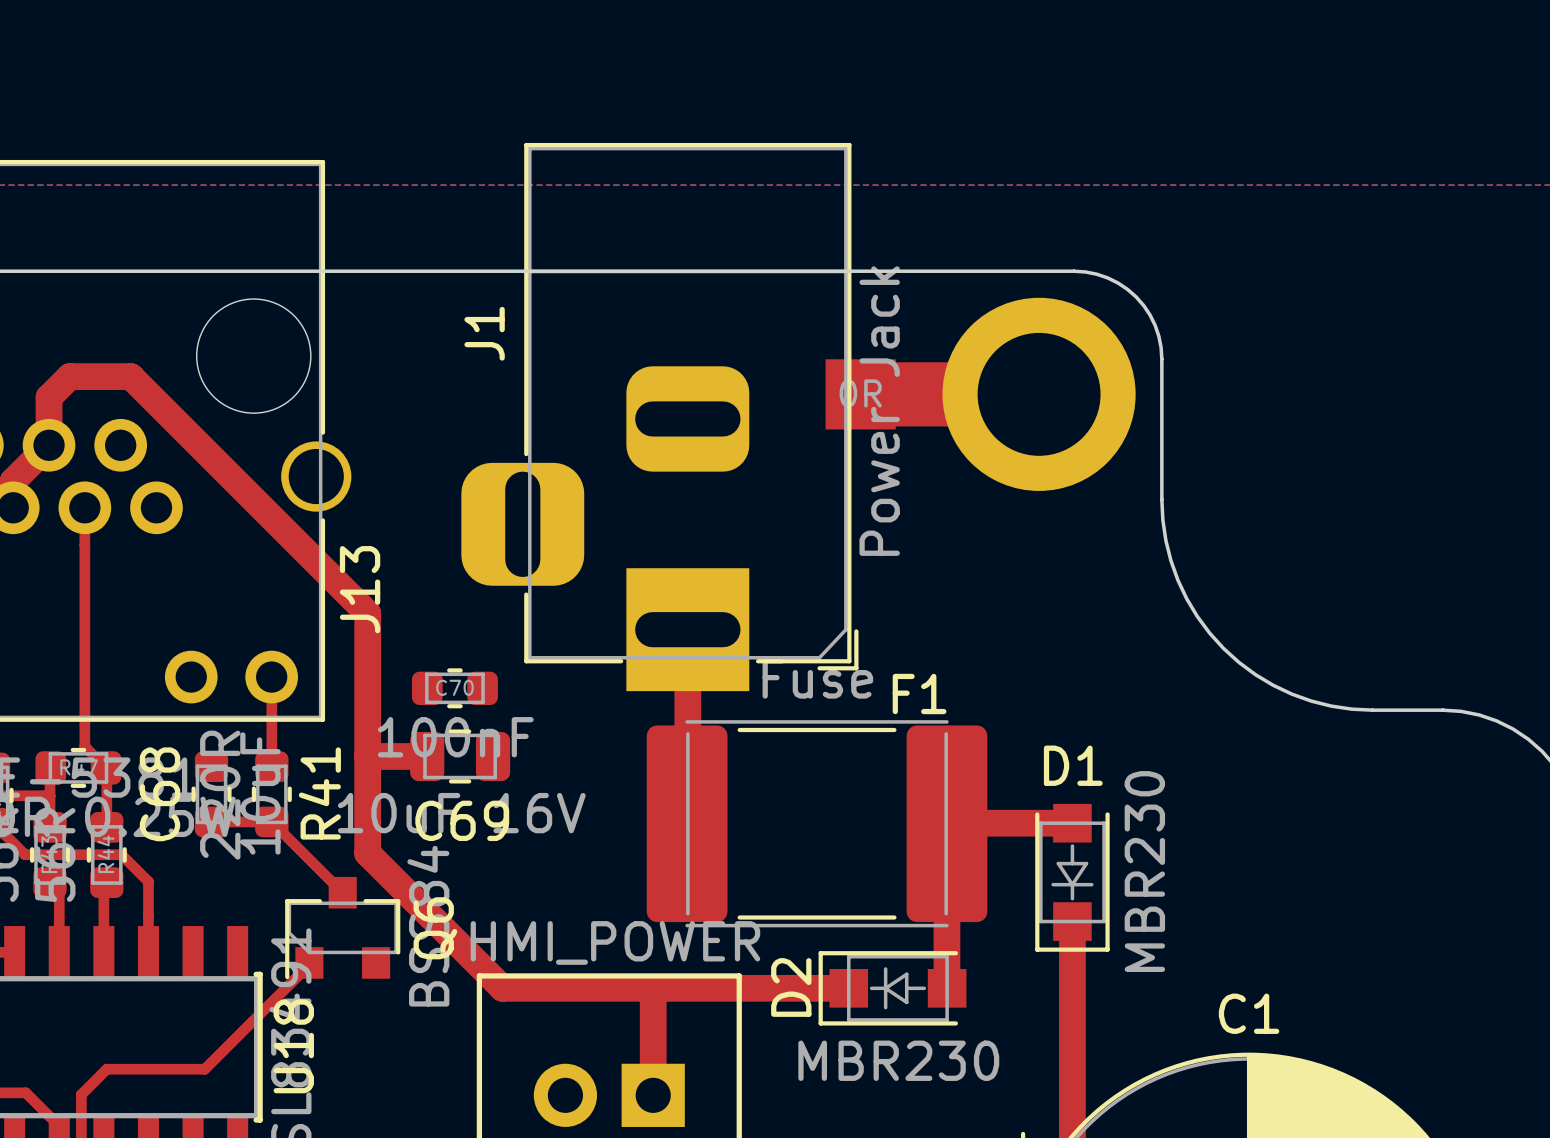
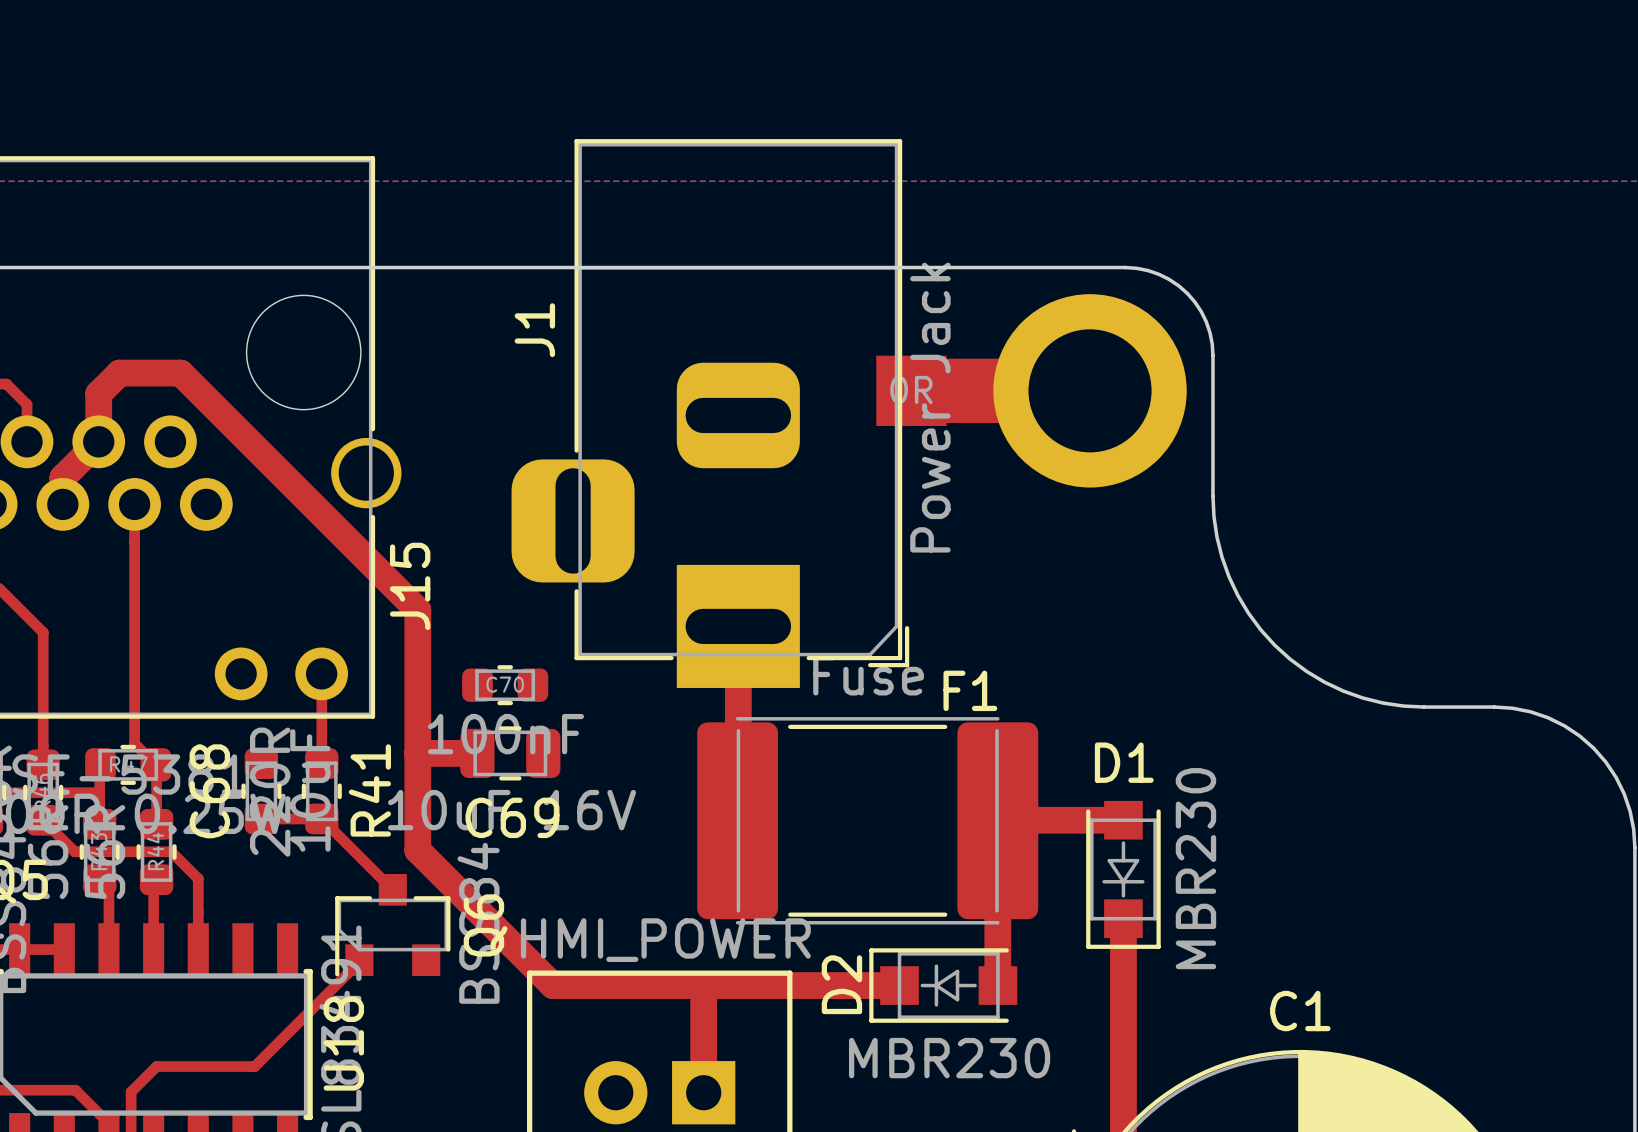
J13 name: J13 (360, 589) -> J15 (410, 586)

